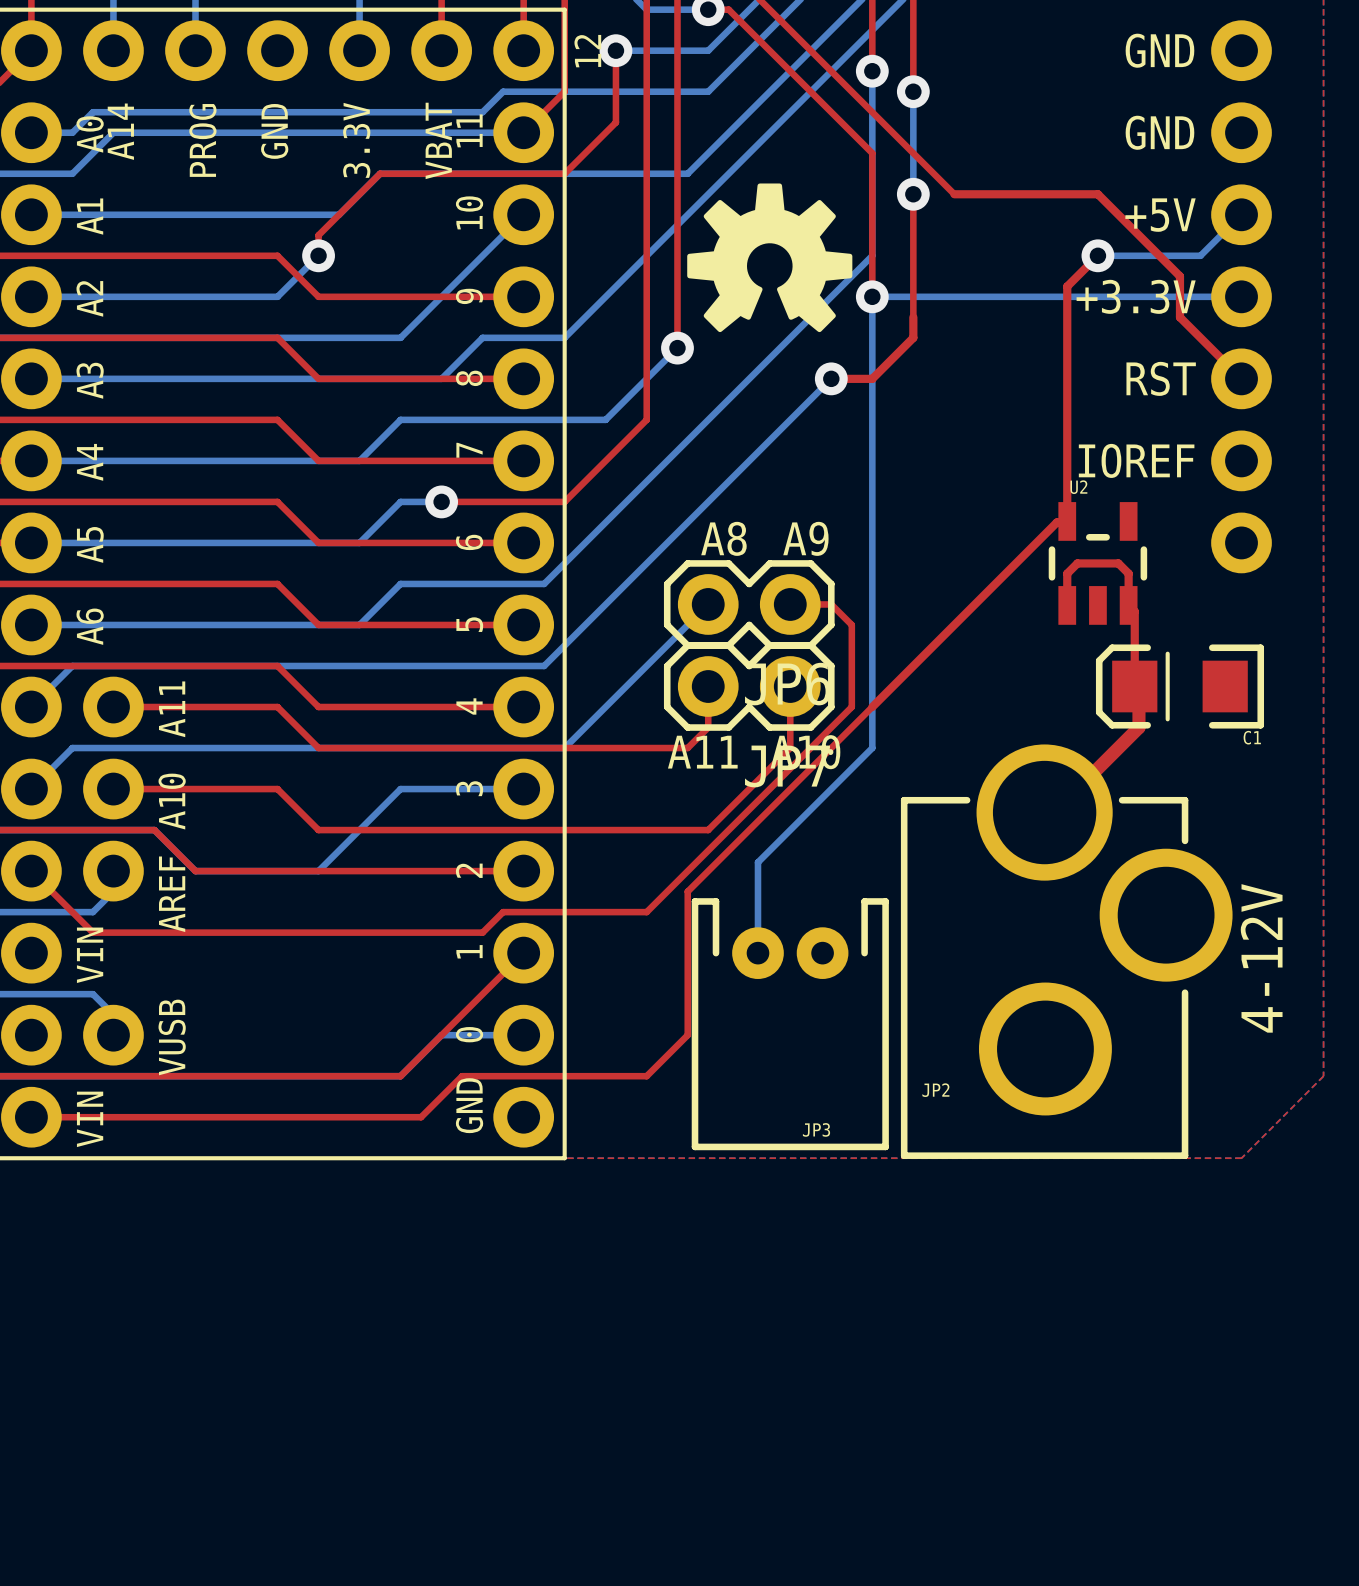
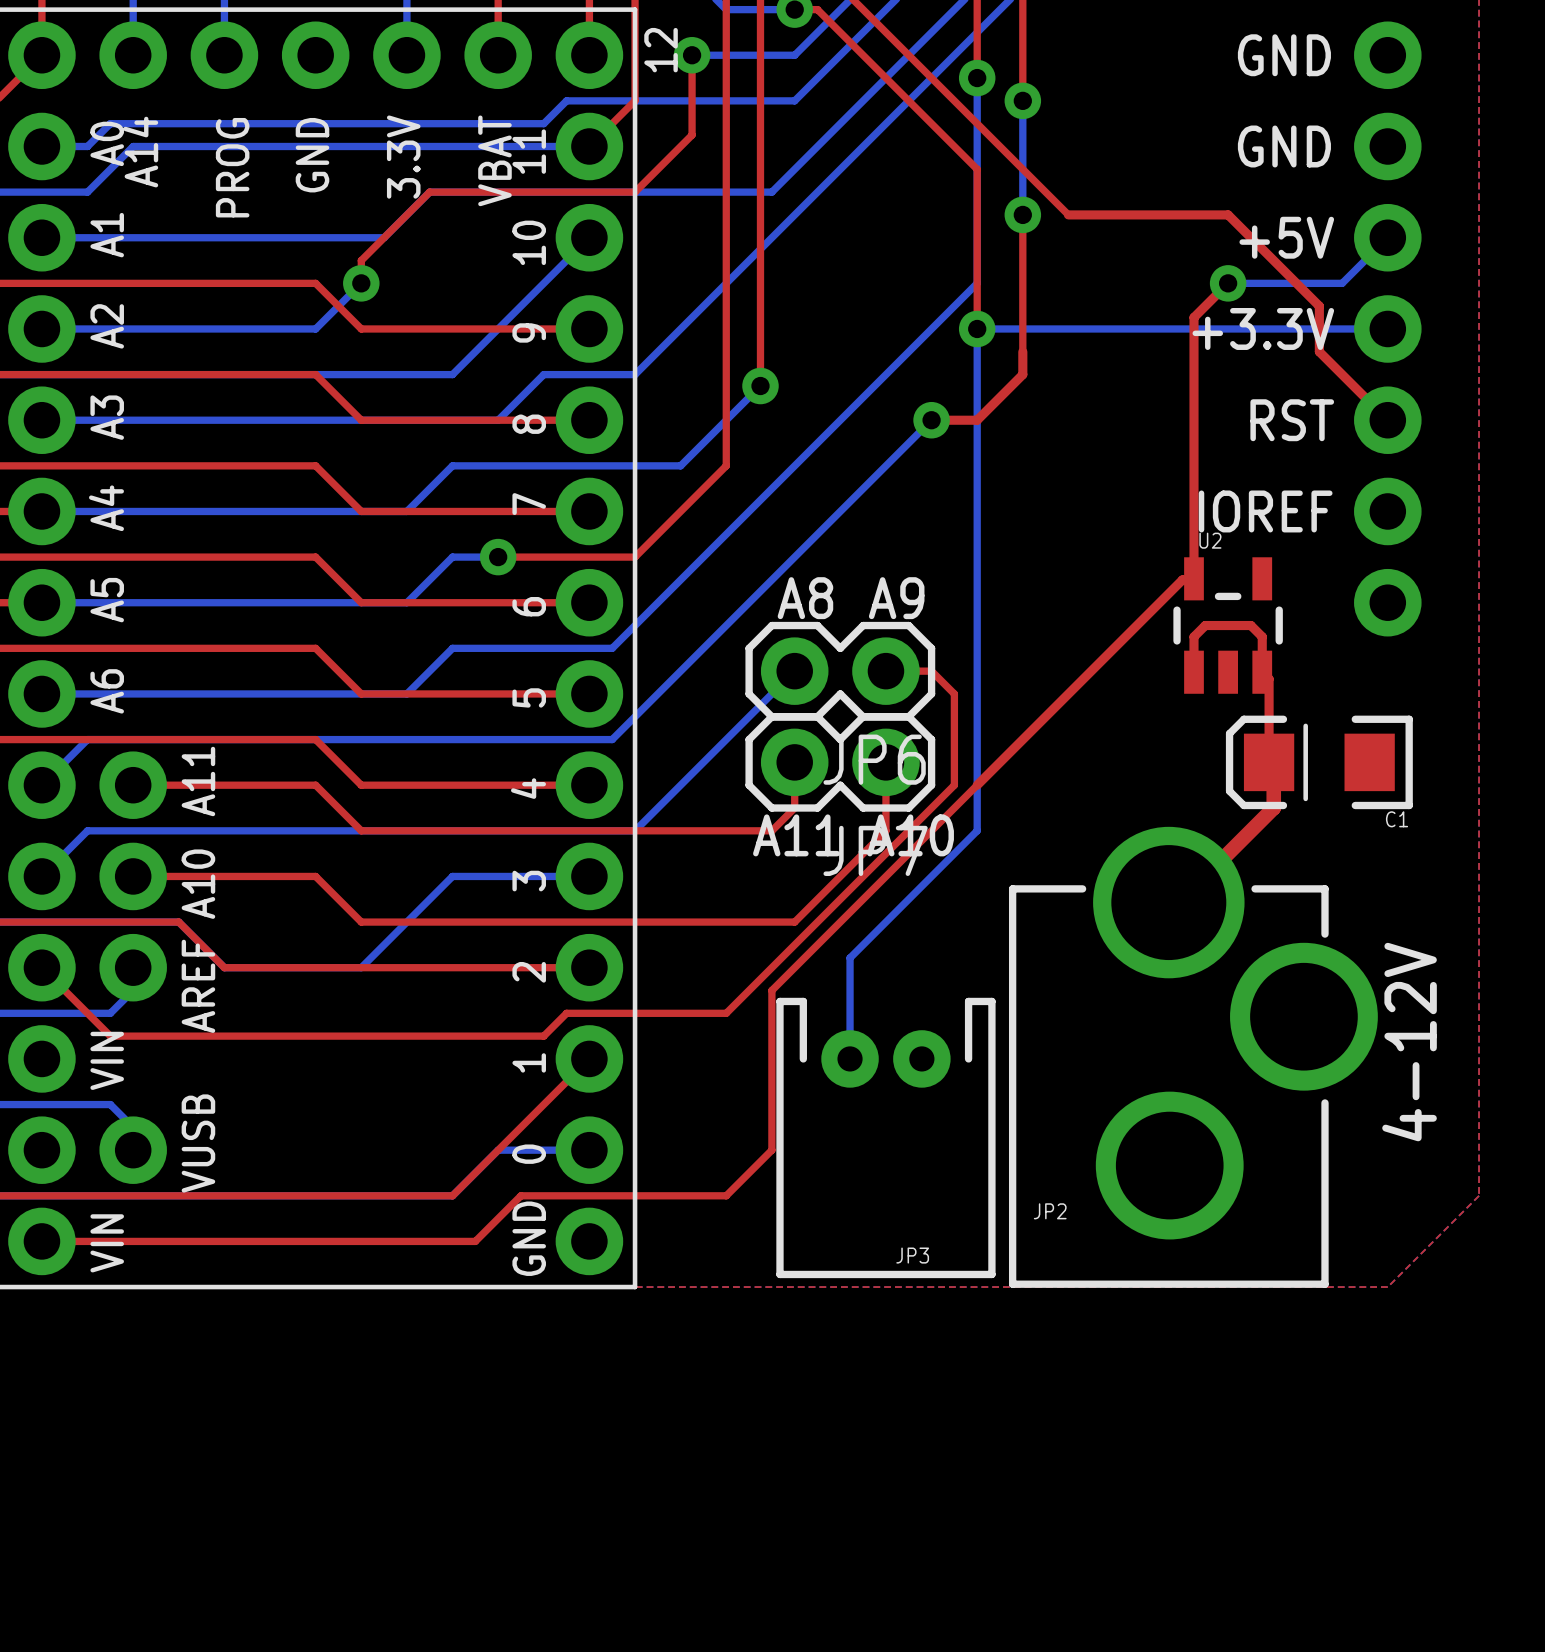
drawing: [687, 183, 853, 333] -> none

